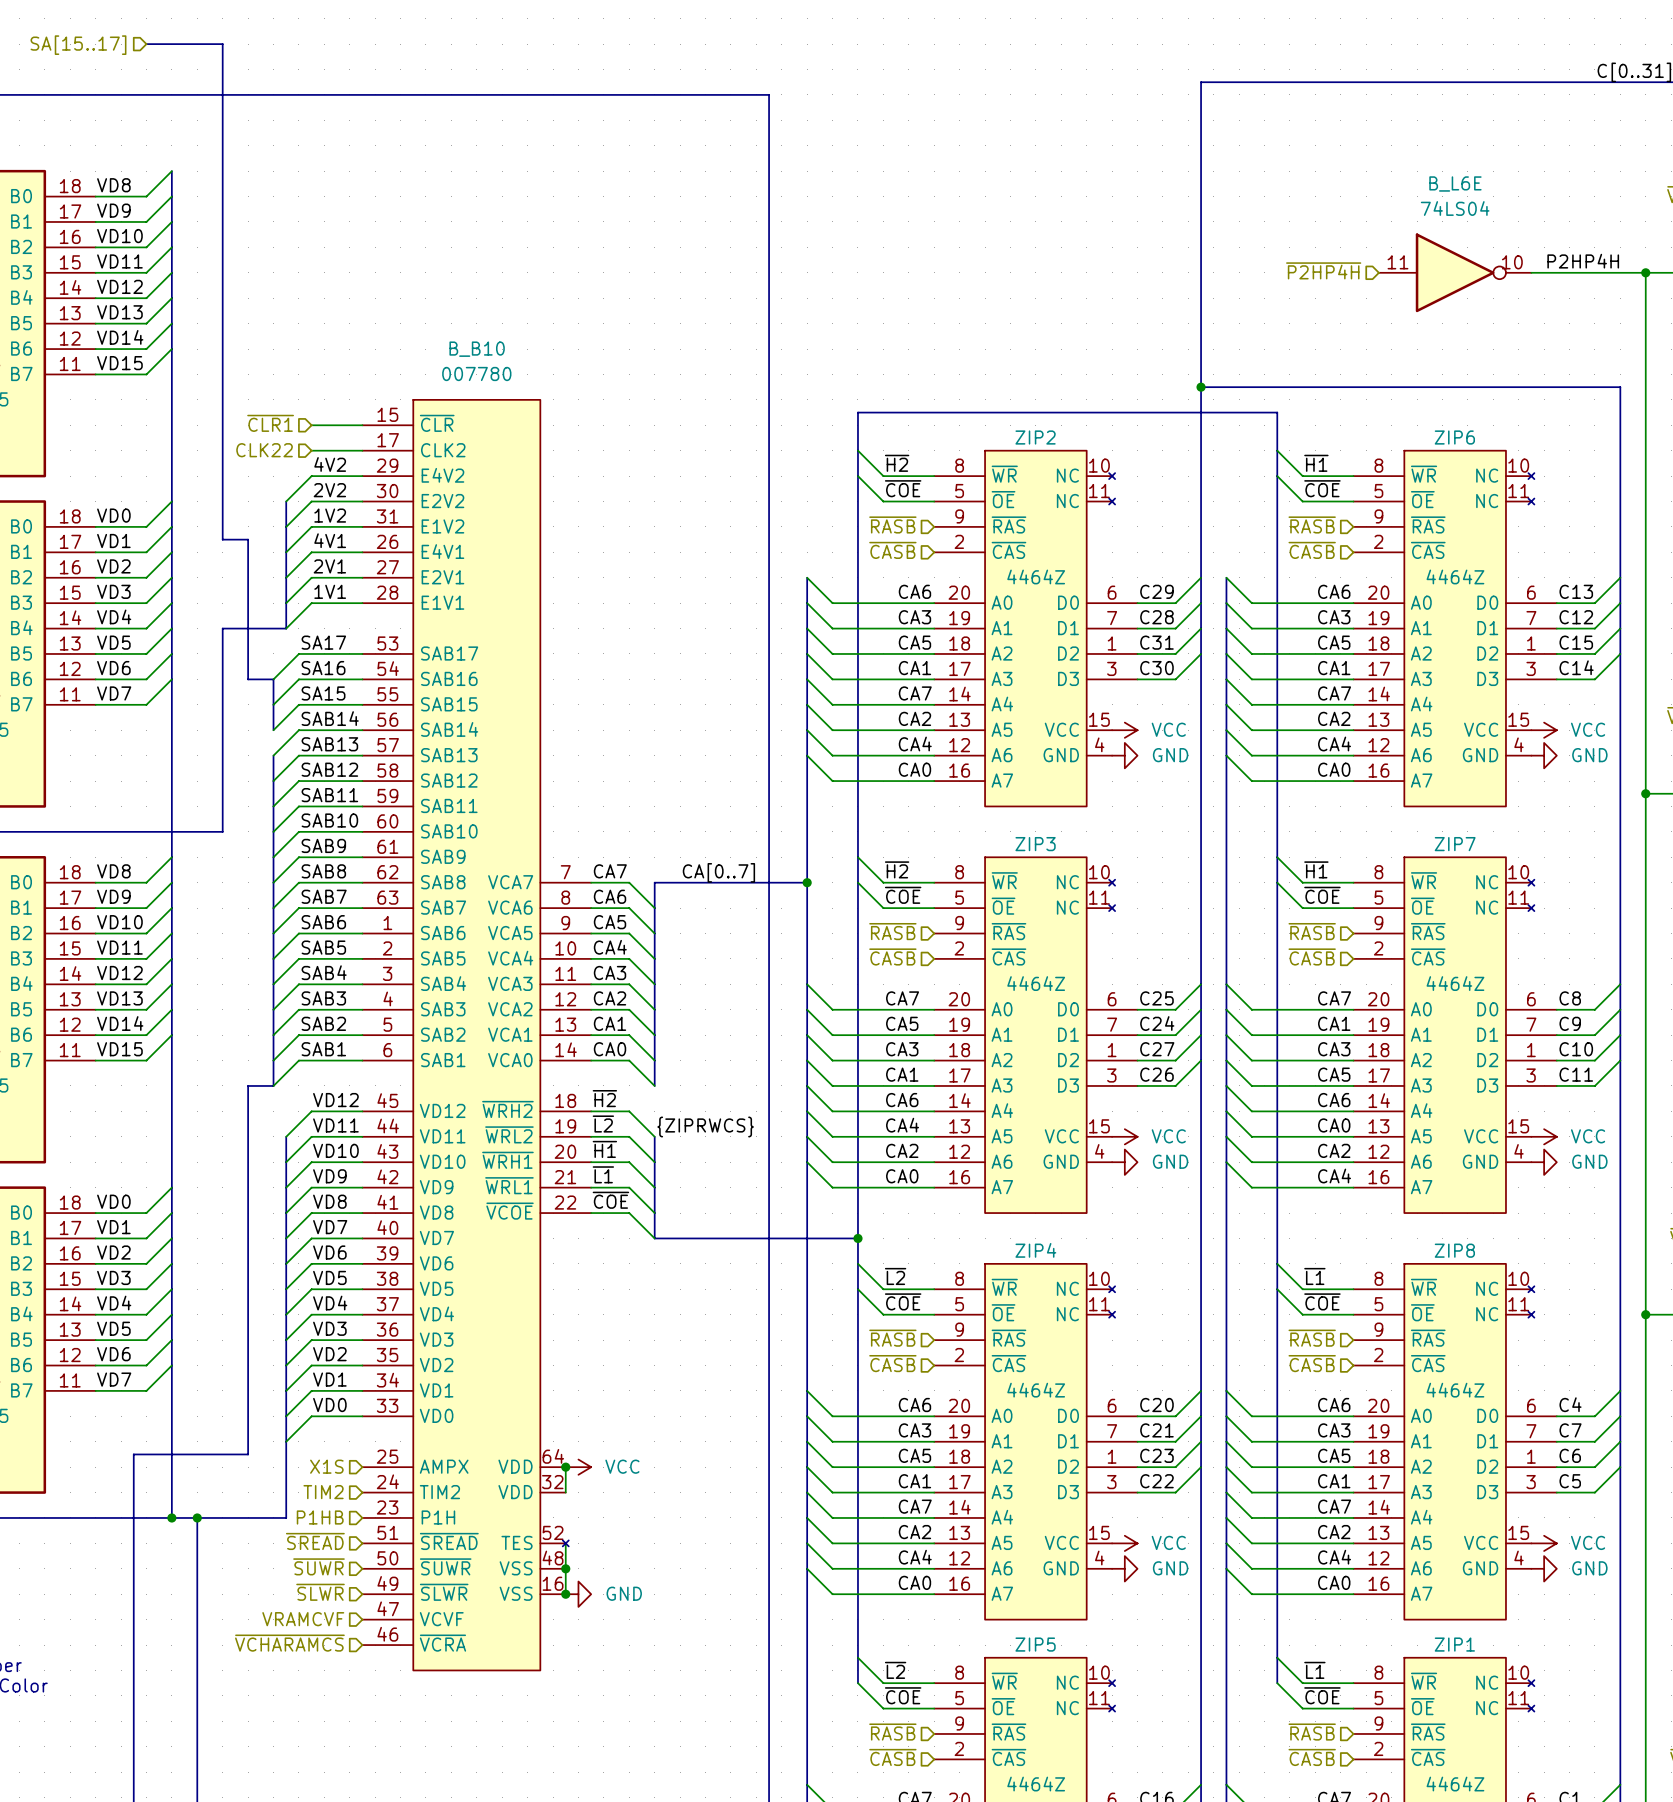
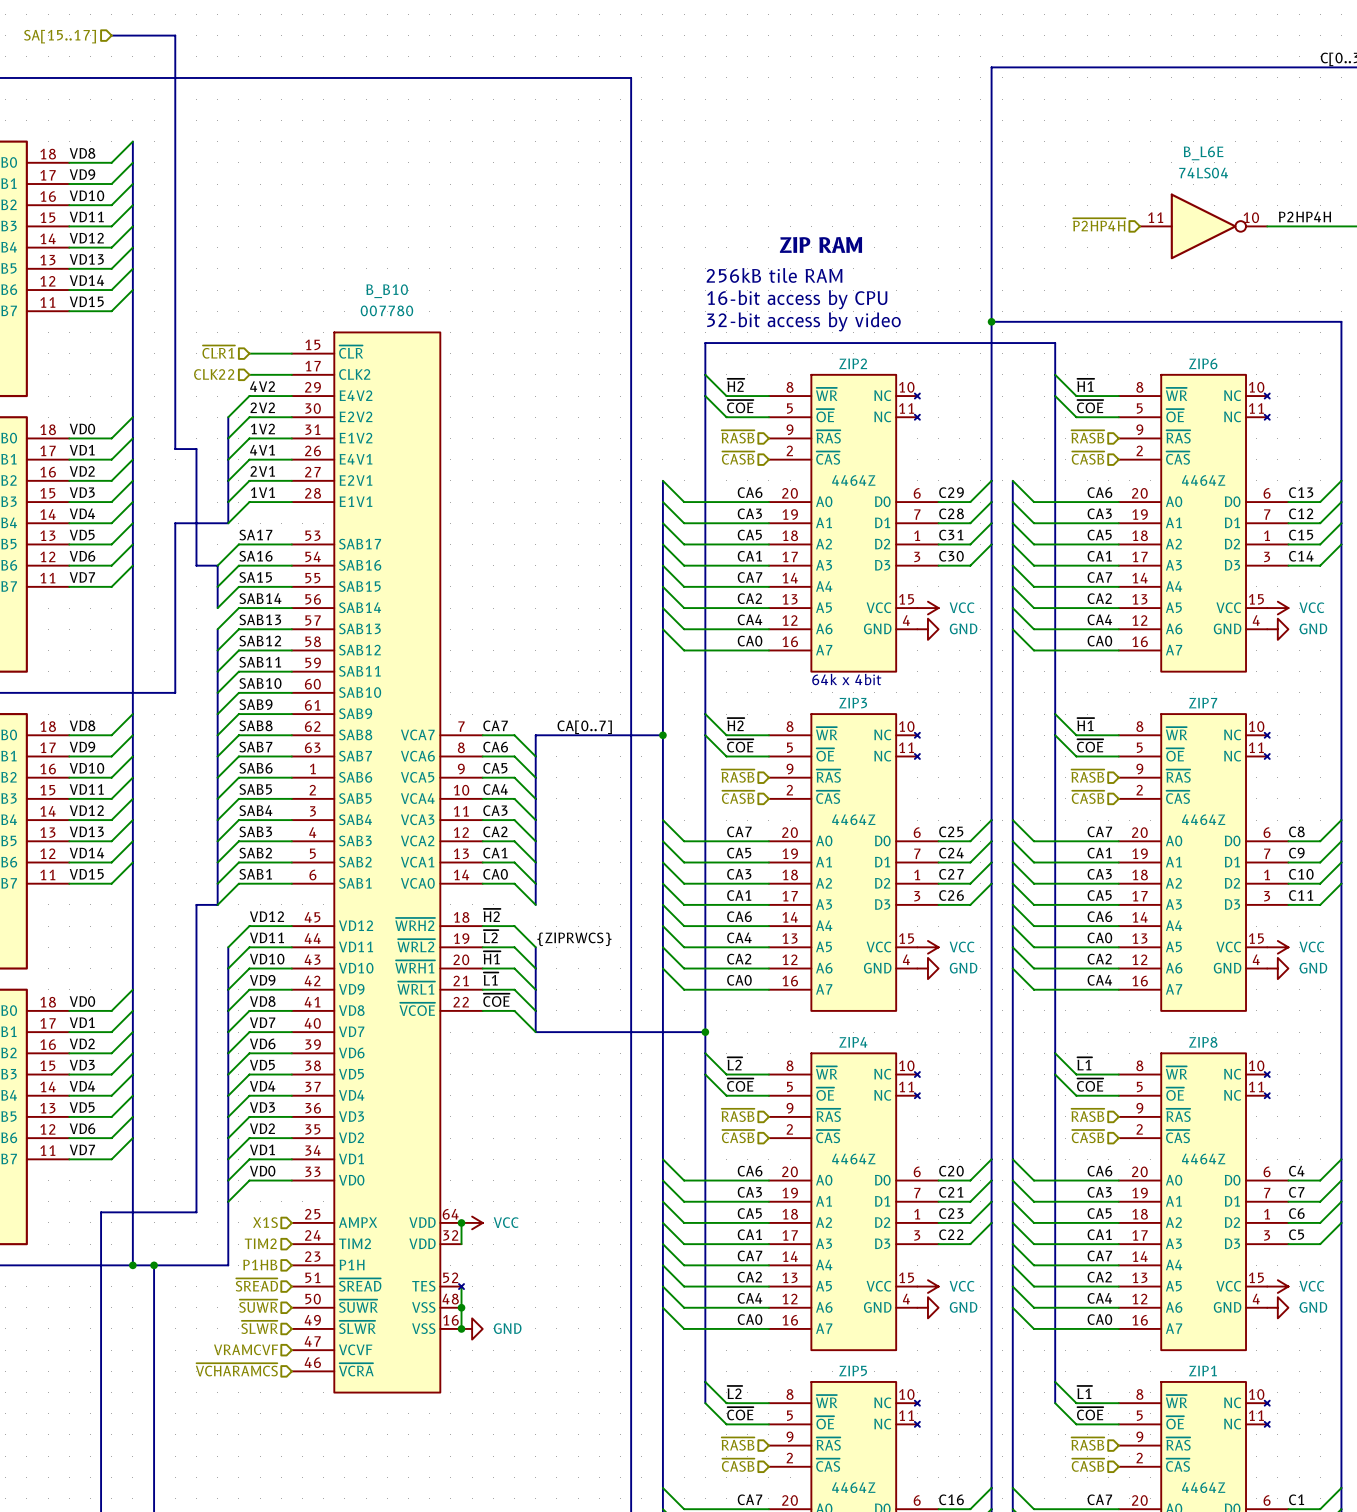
text: none -> ZIP RAM (820, 244)
text: none -> 256kB tile RAM (774, 275)
text: none -> 16-bit access by CPU (797, 299)
text: none -> 32-bit access by video (803, 321)
text: none -> 64k x 4bit (846, 679)

